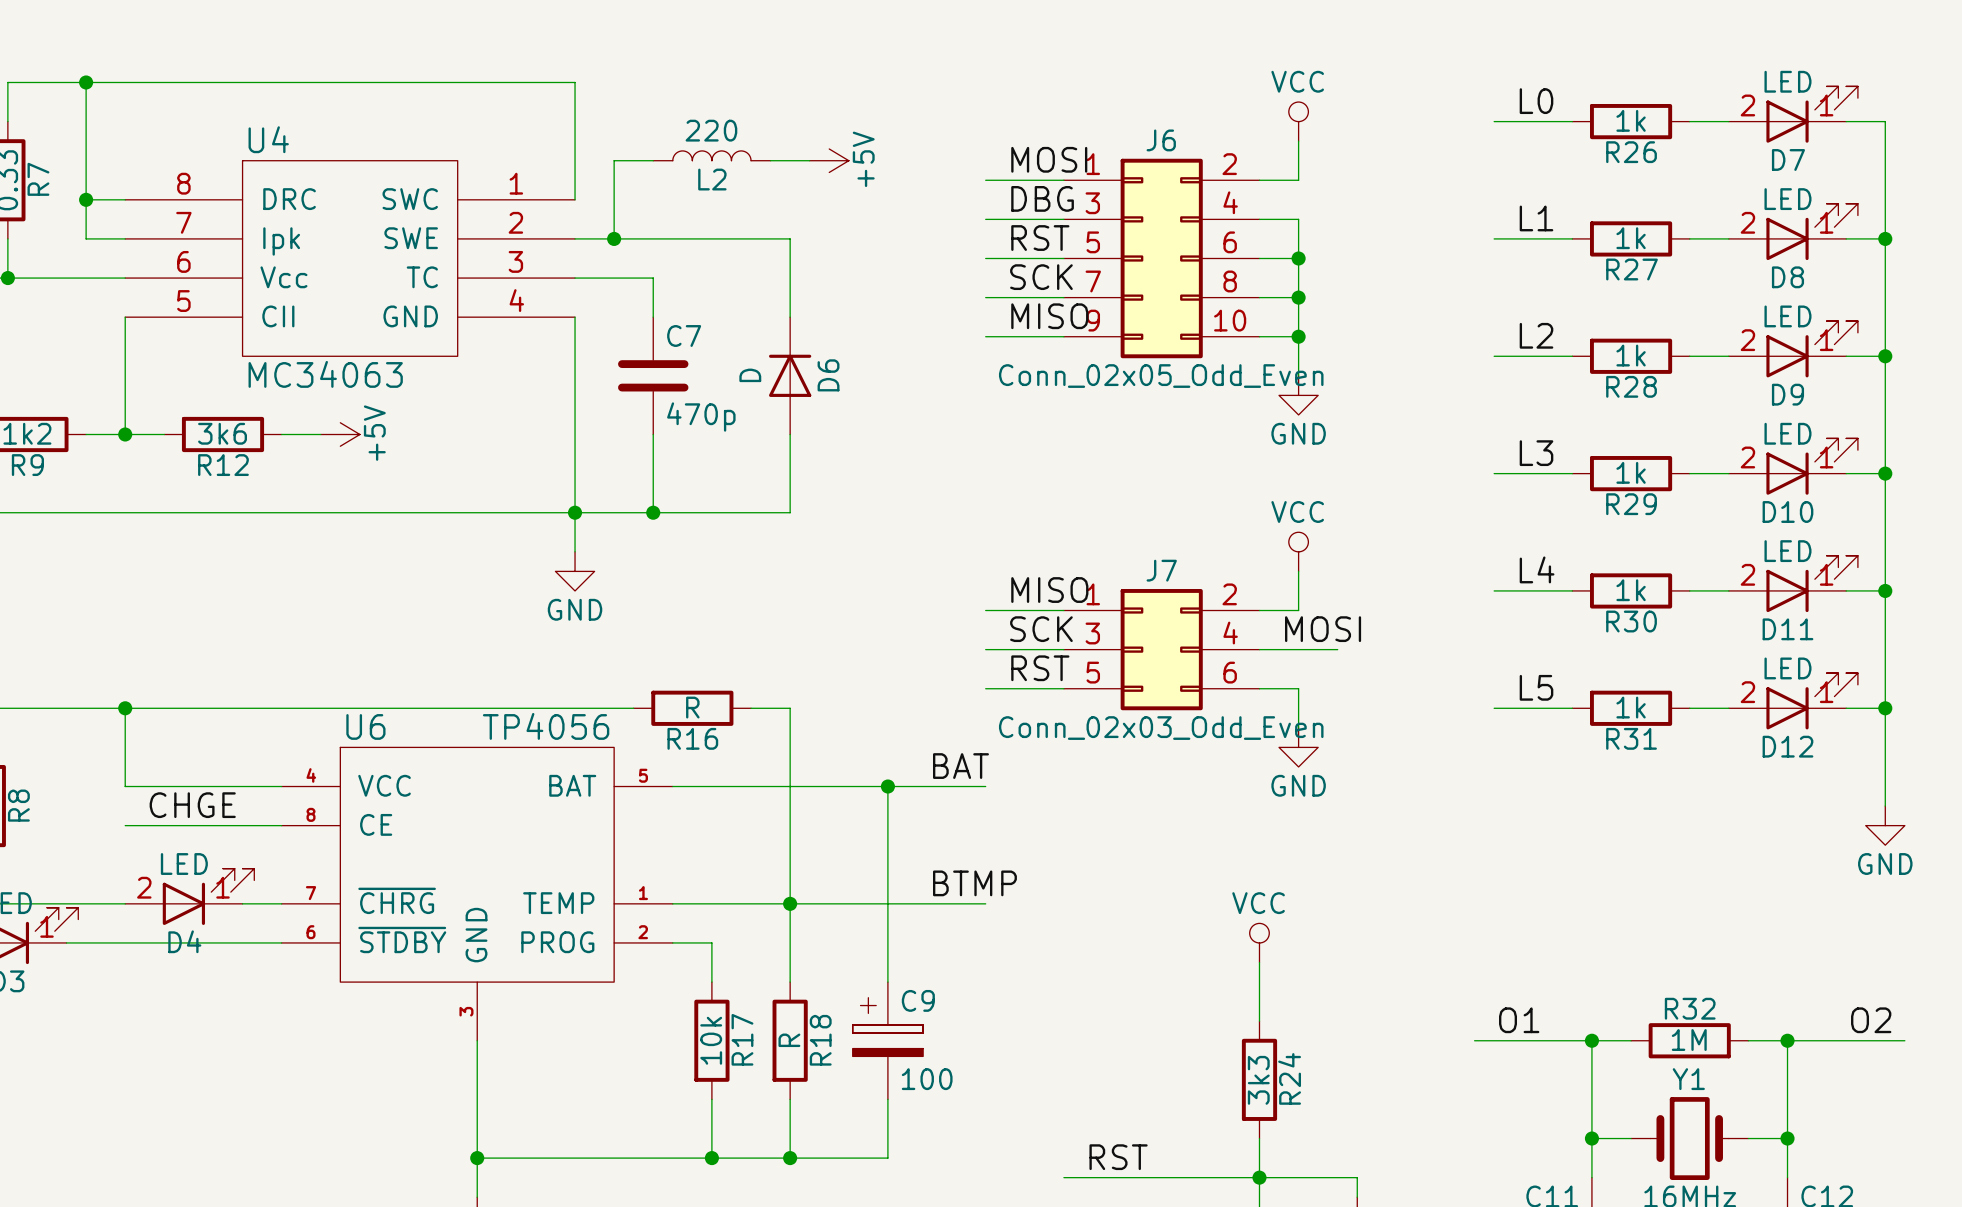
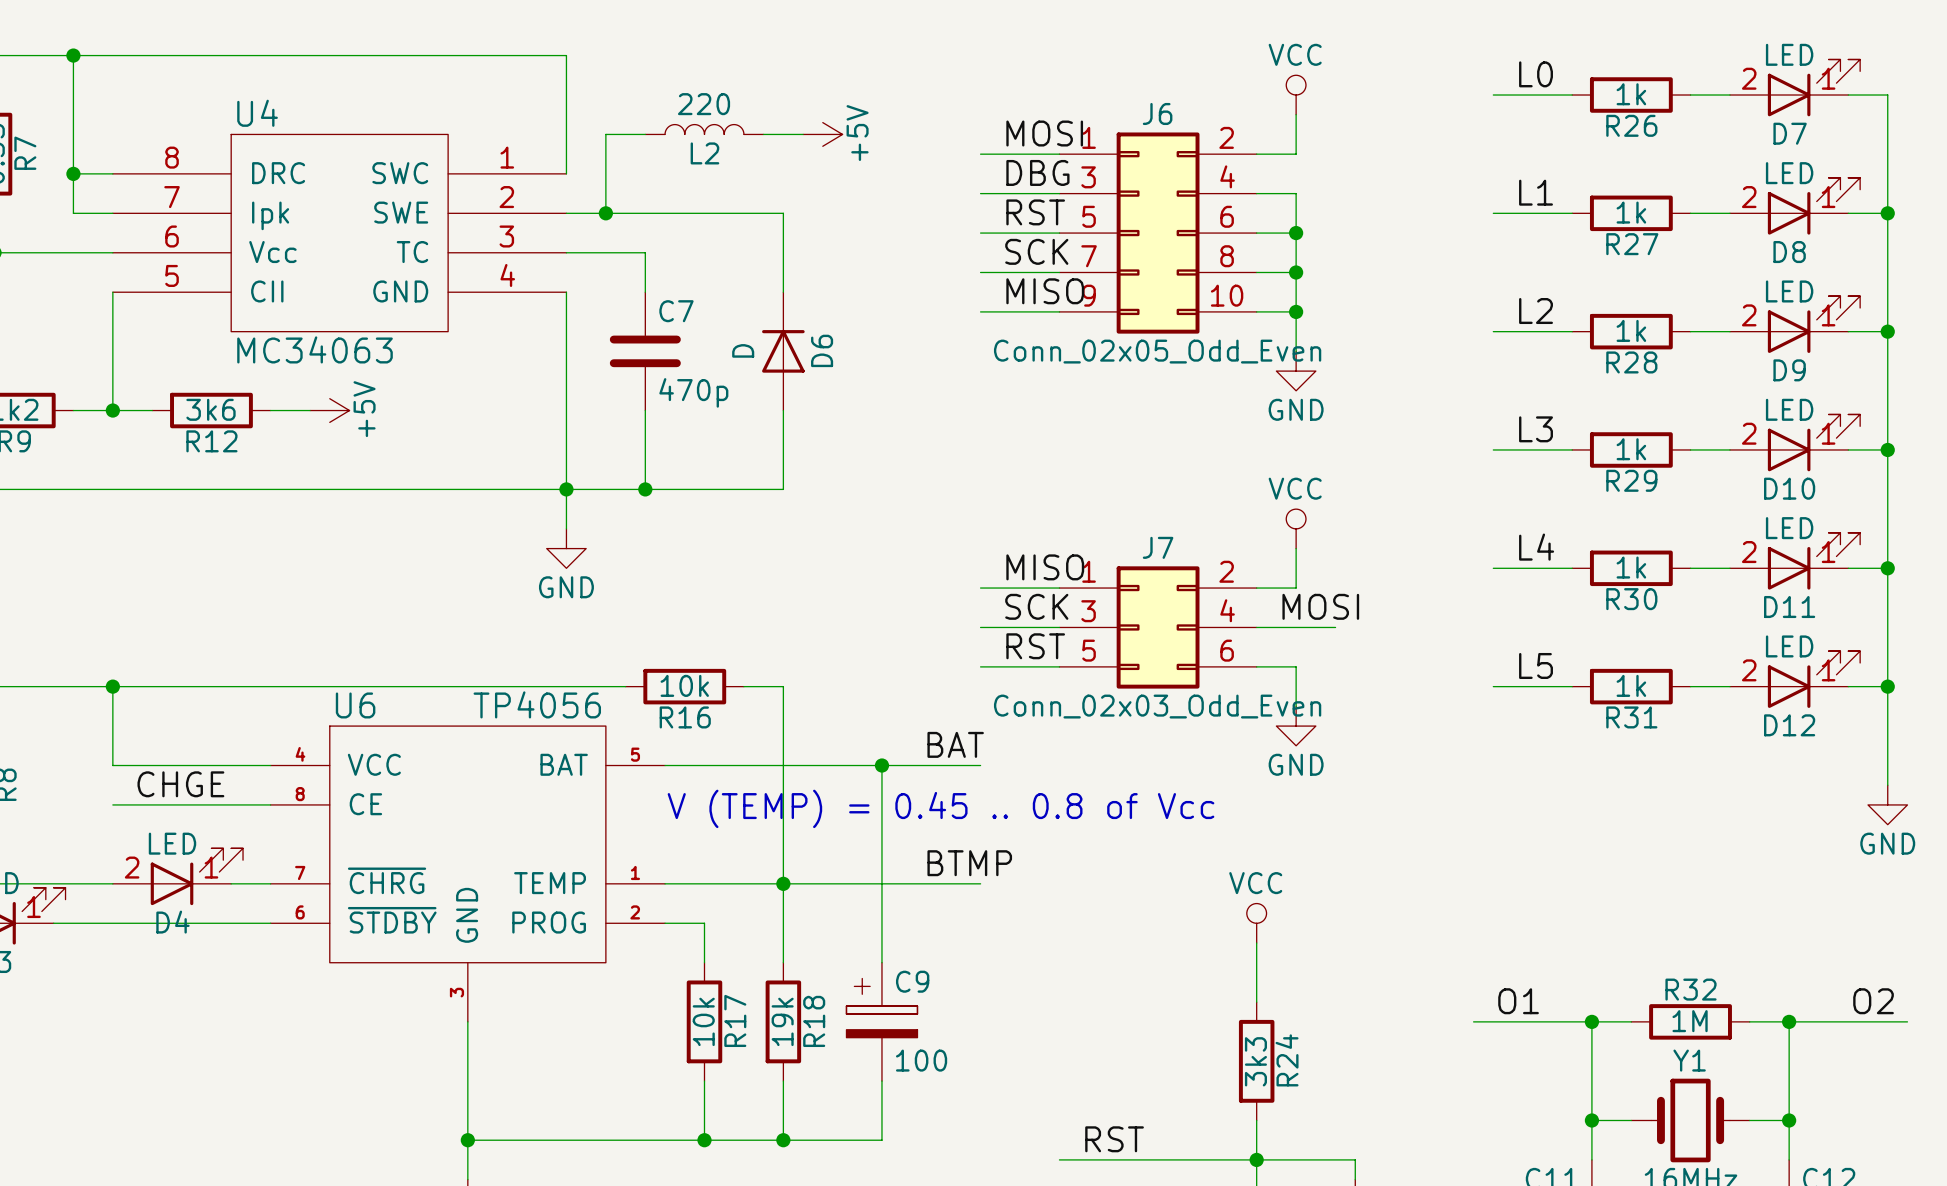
R16 value: R (692, 707) -> 10k (684, 685)
text: none -> V (TEMP) = 0.45 .. 0.8 of Vcc (941, 808)
R18 value: R (789, 1040) -> 19k (782, 1021)

